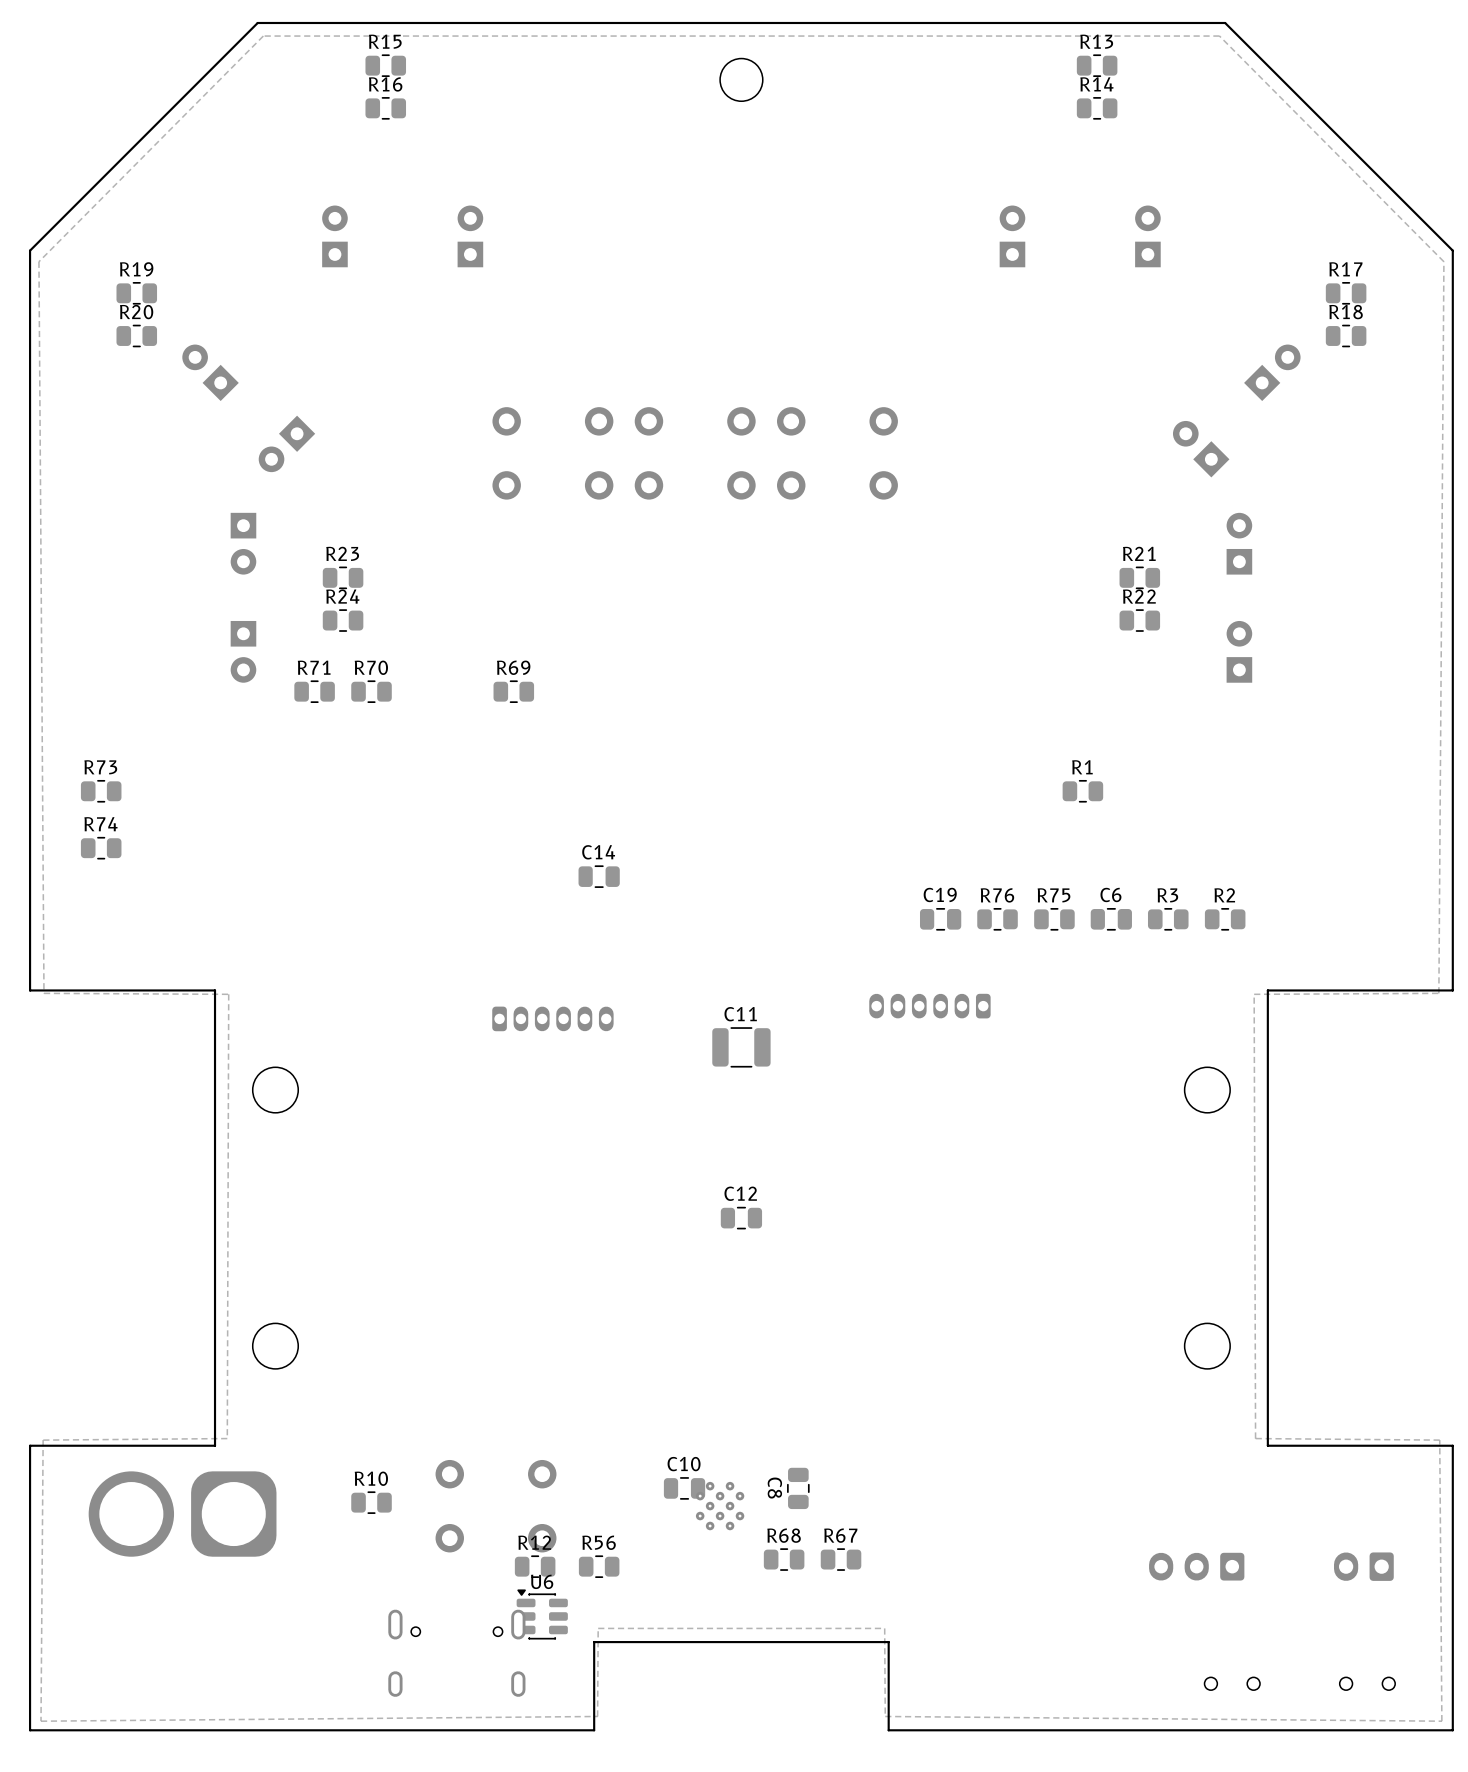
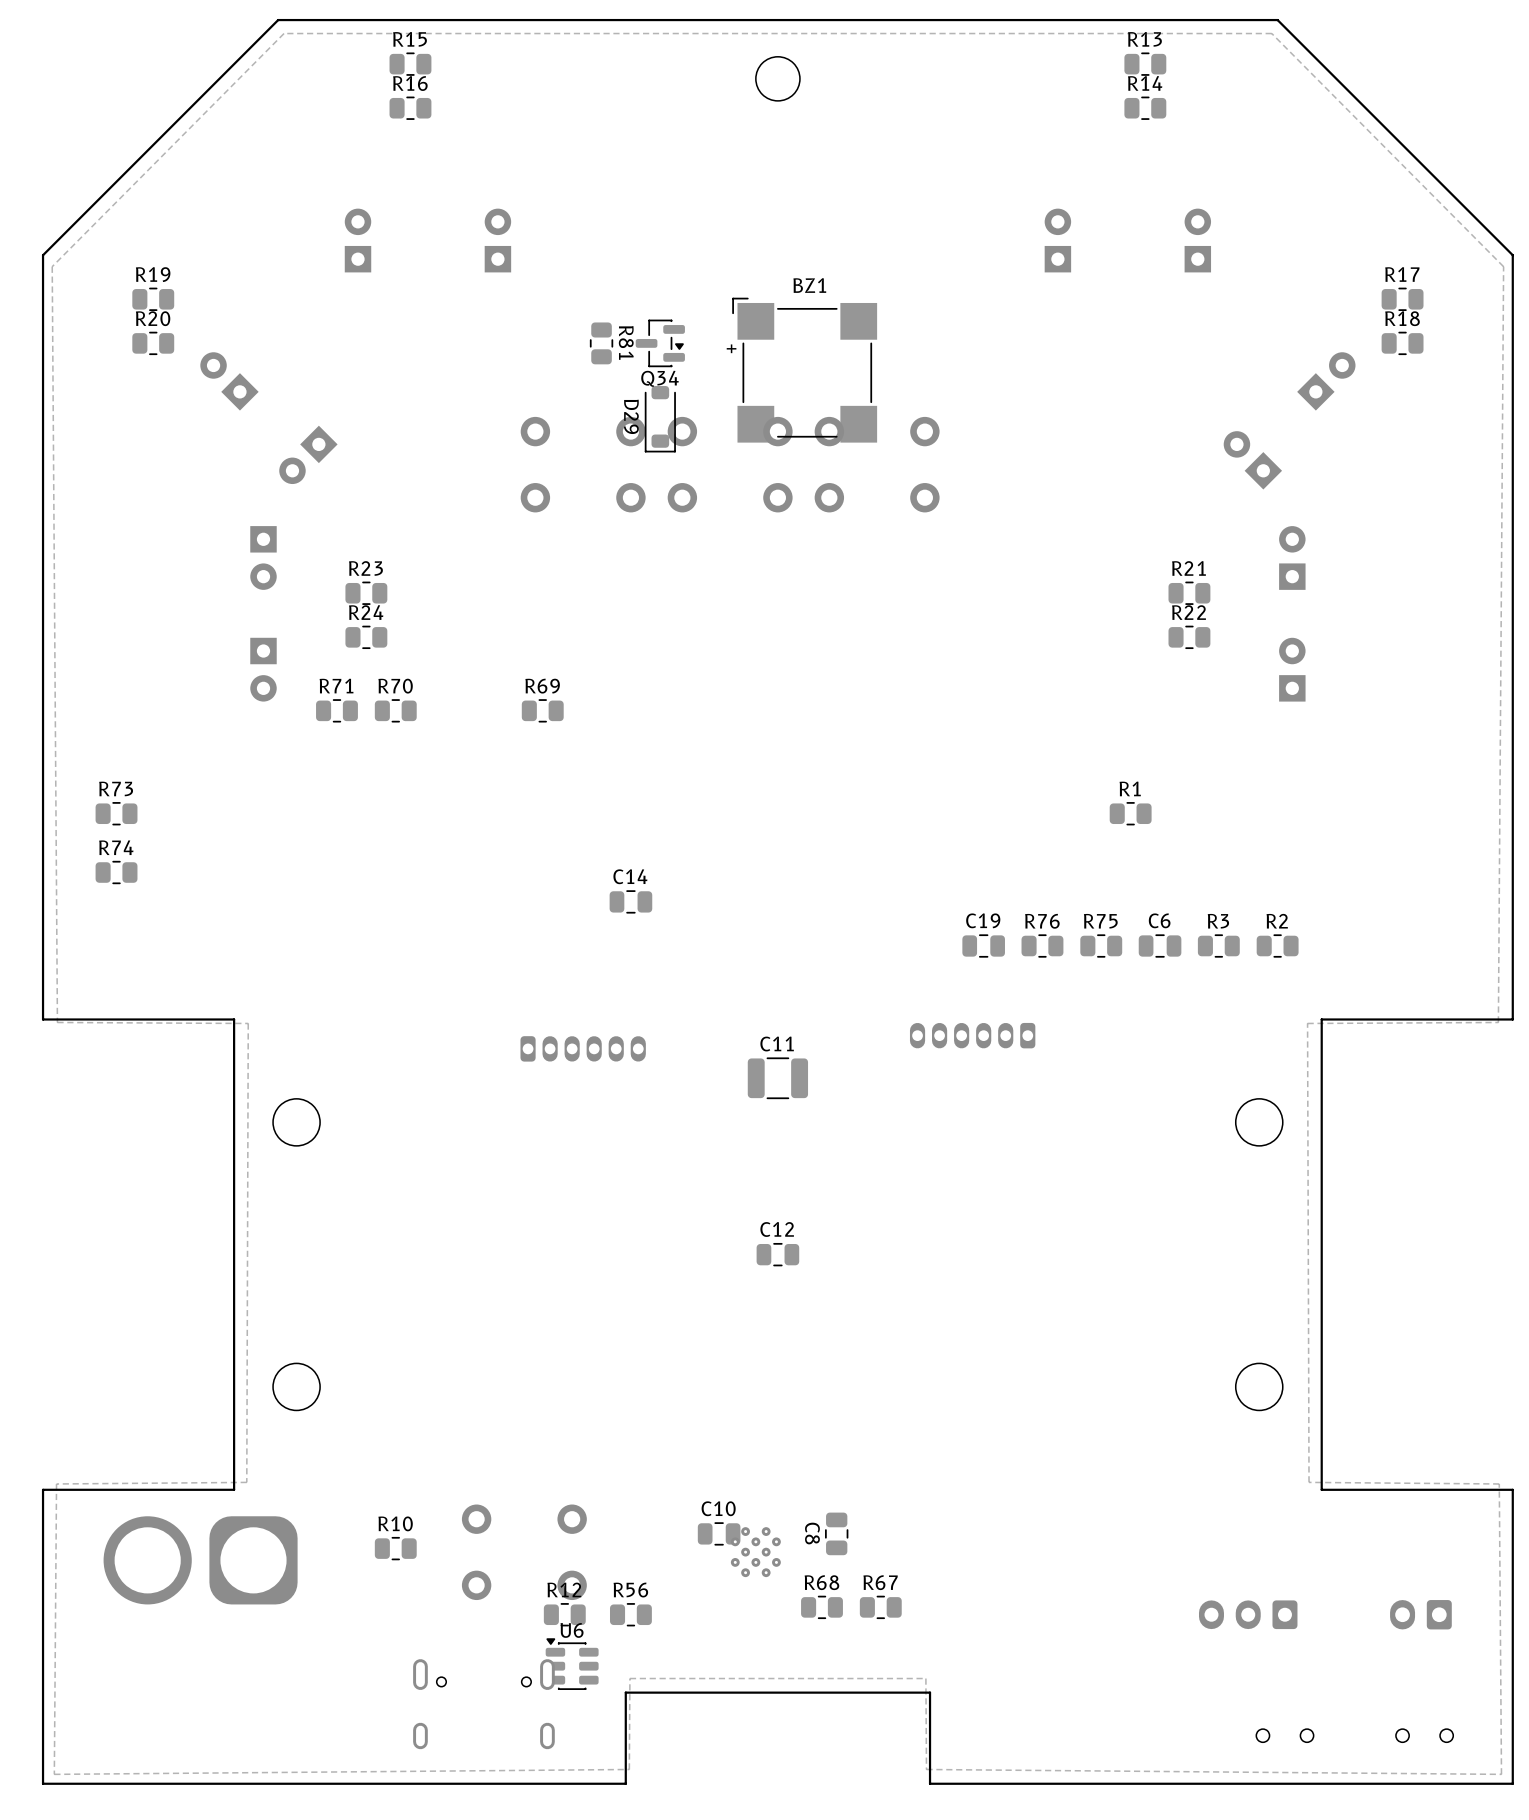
R81: none -> (601, 343)
Q34: none -> (660, 343)
BZ1: none -> (804, 370)
D29: none -> (660, 419)

